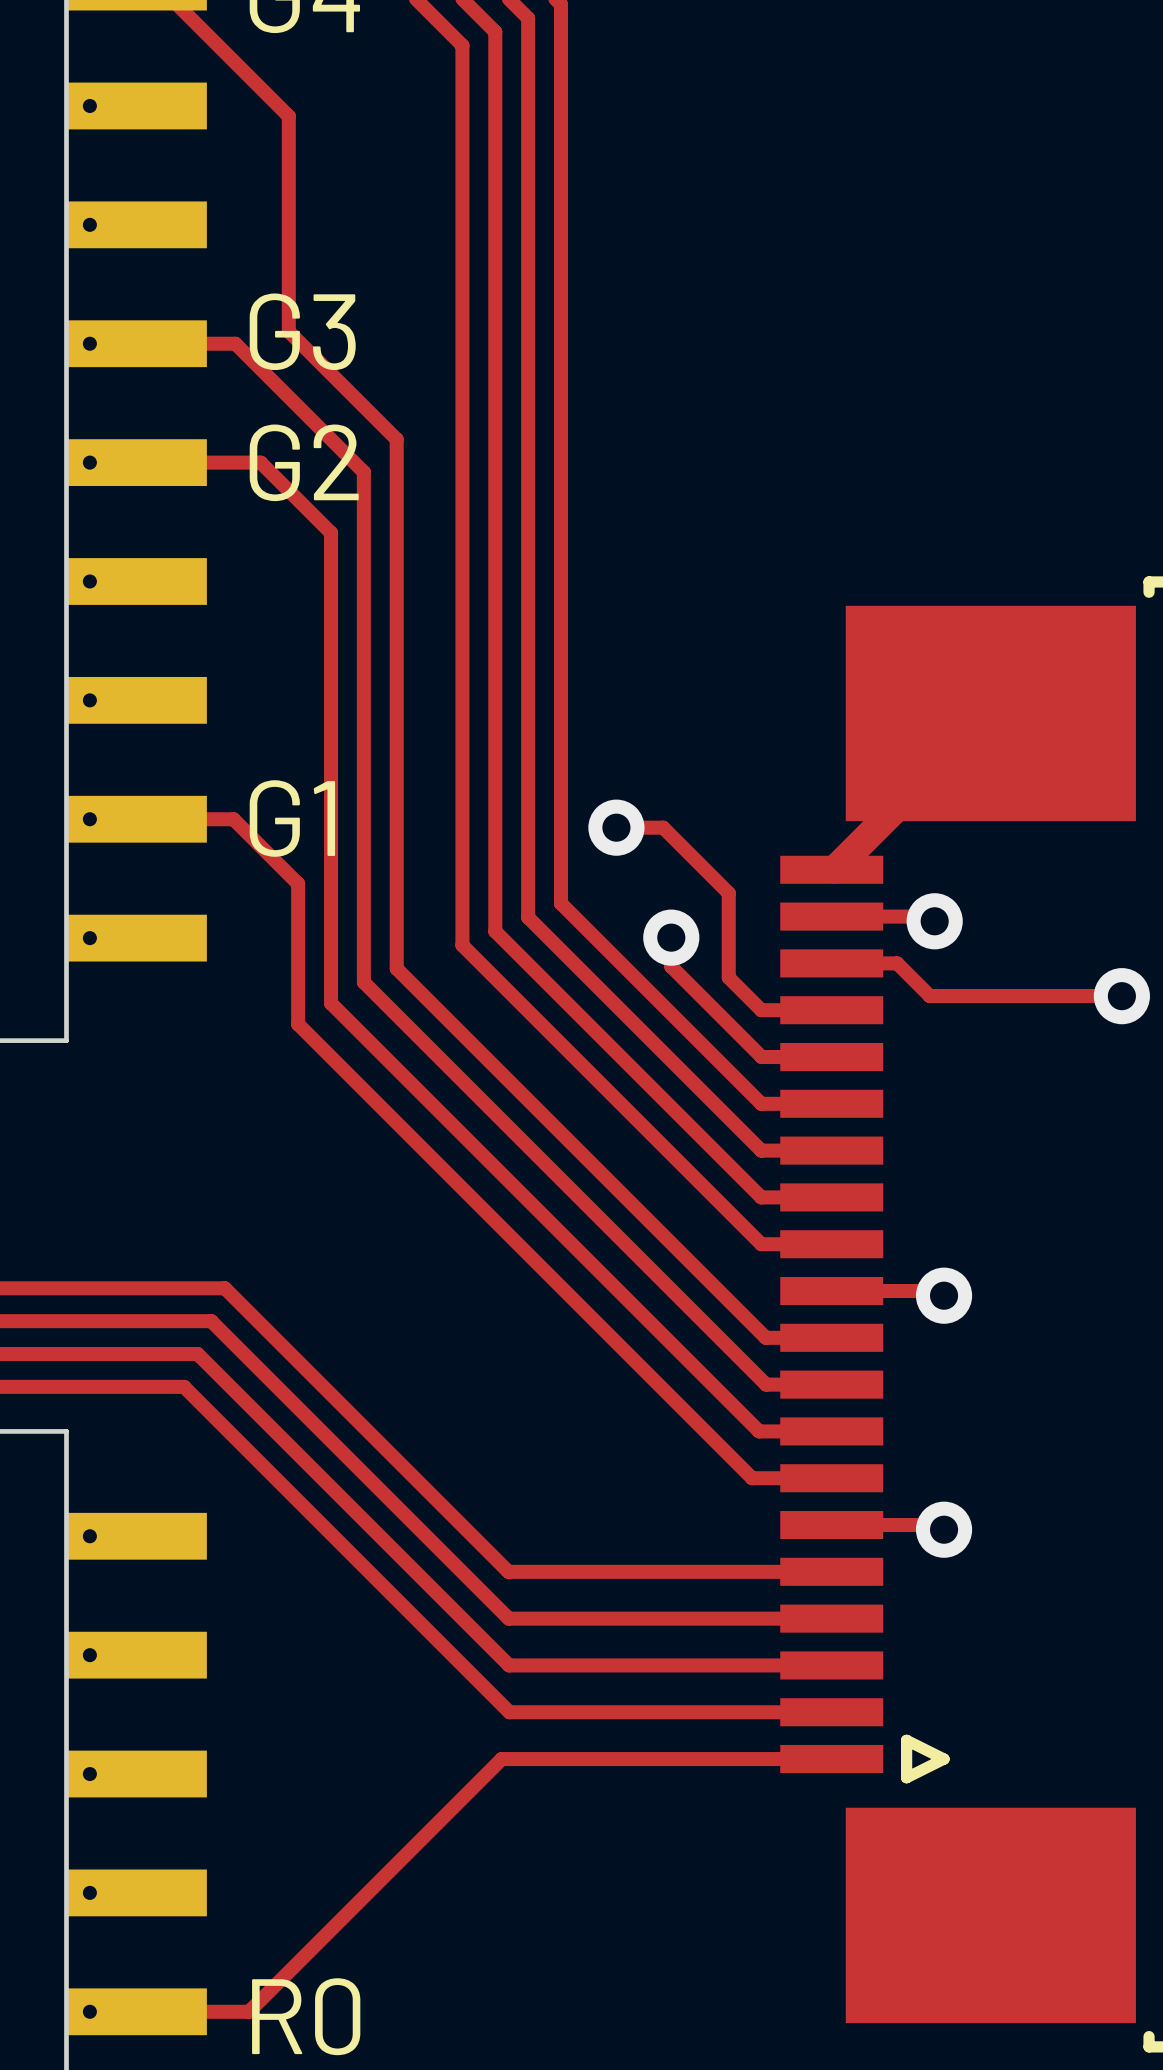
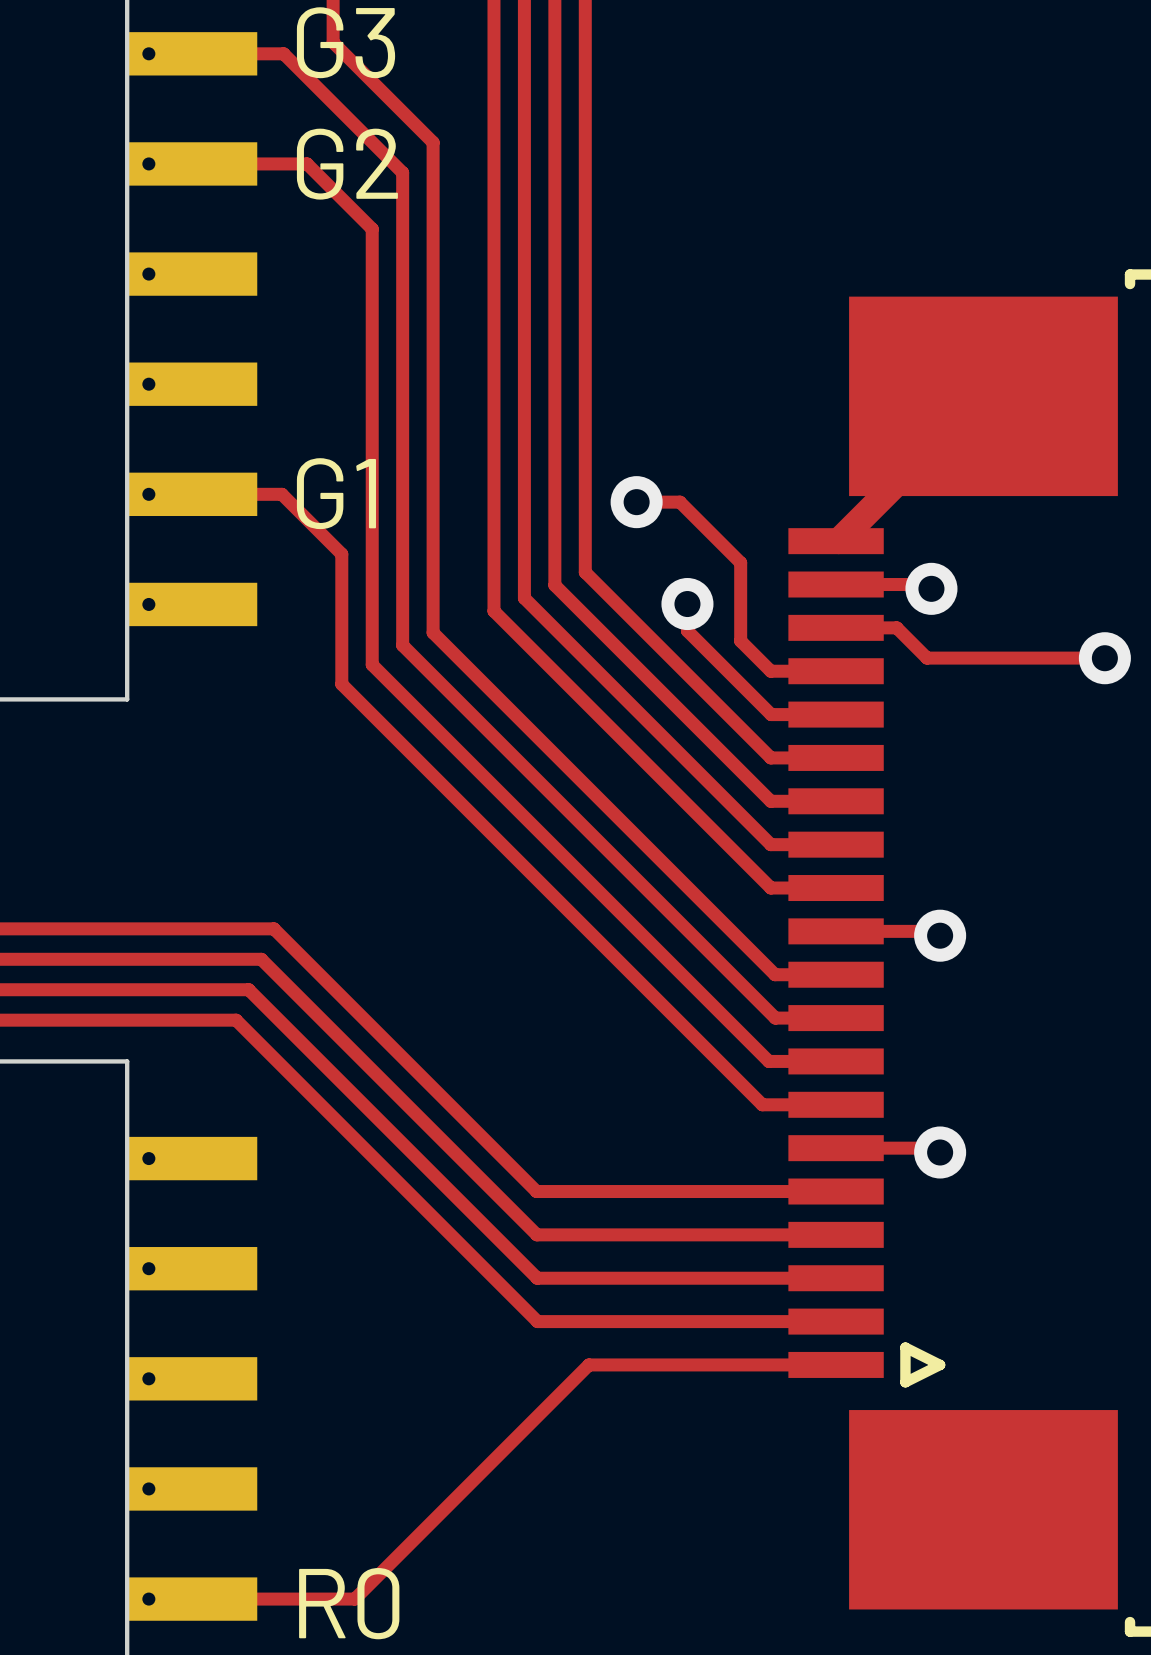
track: (564, 1759) (501, 1759) (249, 2011) -> (588, 1364) (354, 1599) (296, 1599)

